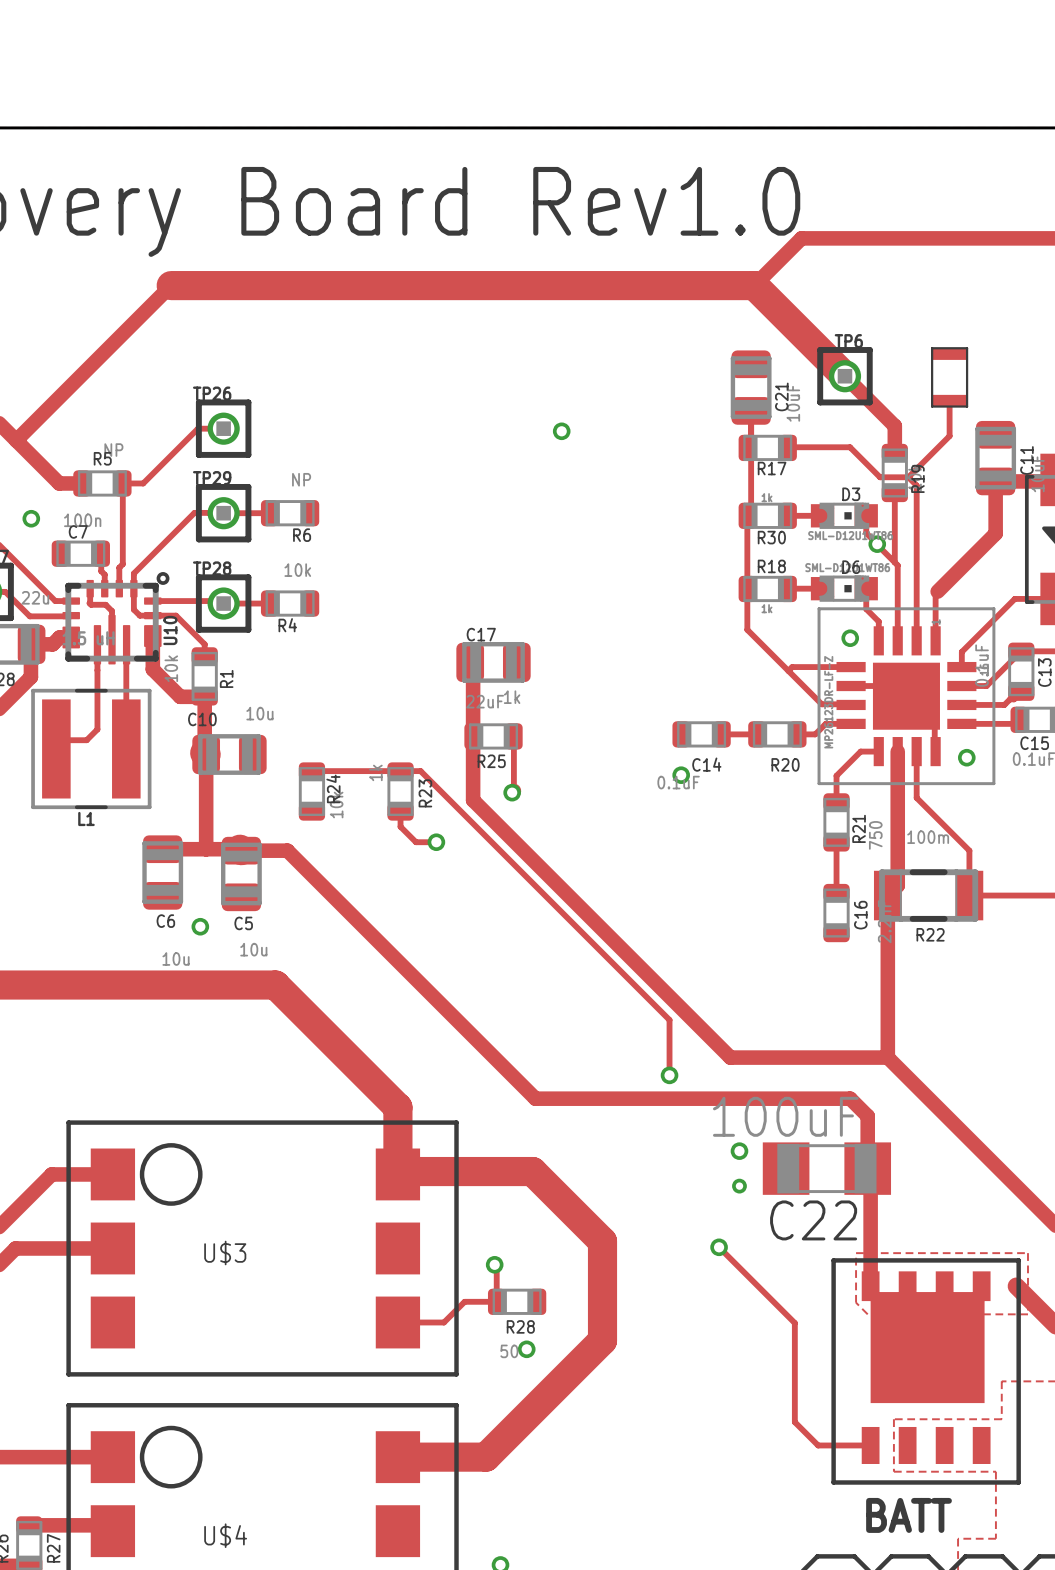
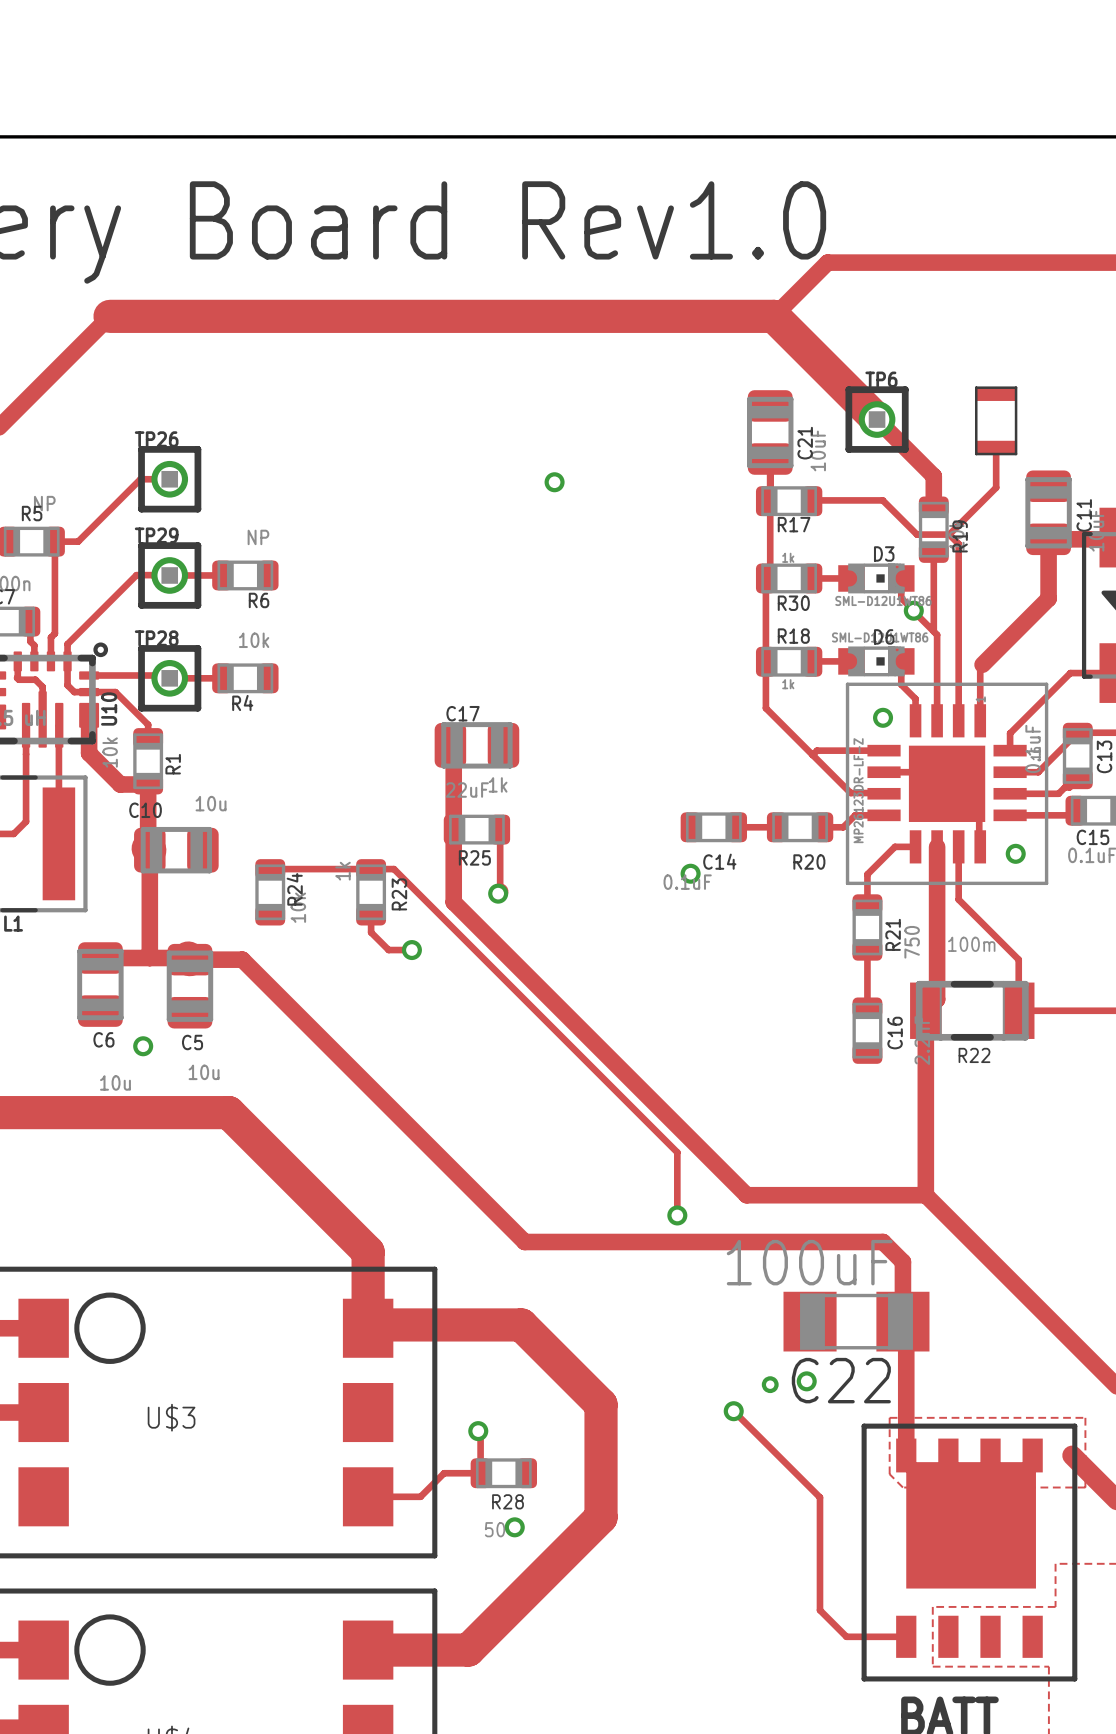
via position: (739, 1151) -> (806, 1381)
via position: (739, 1186) -> (770, 1384)

